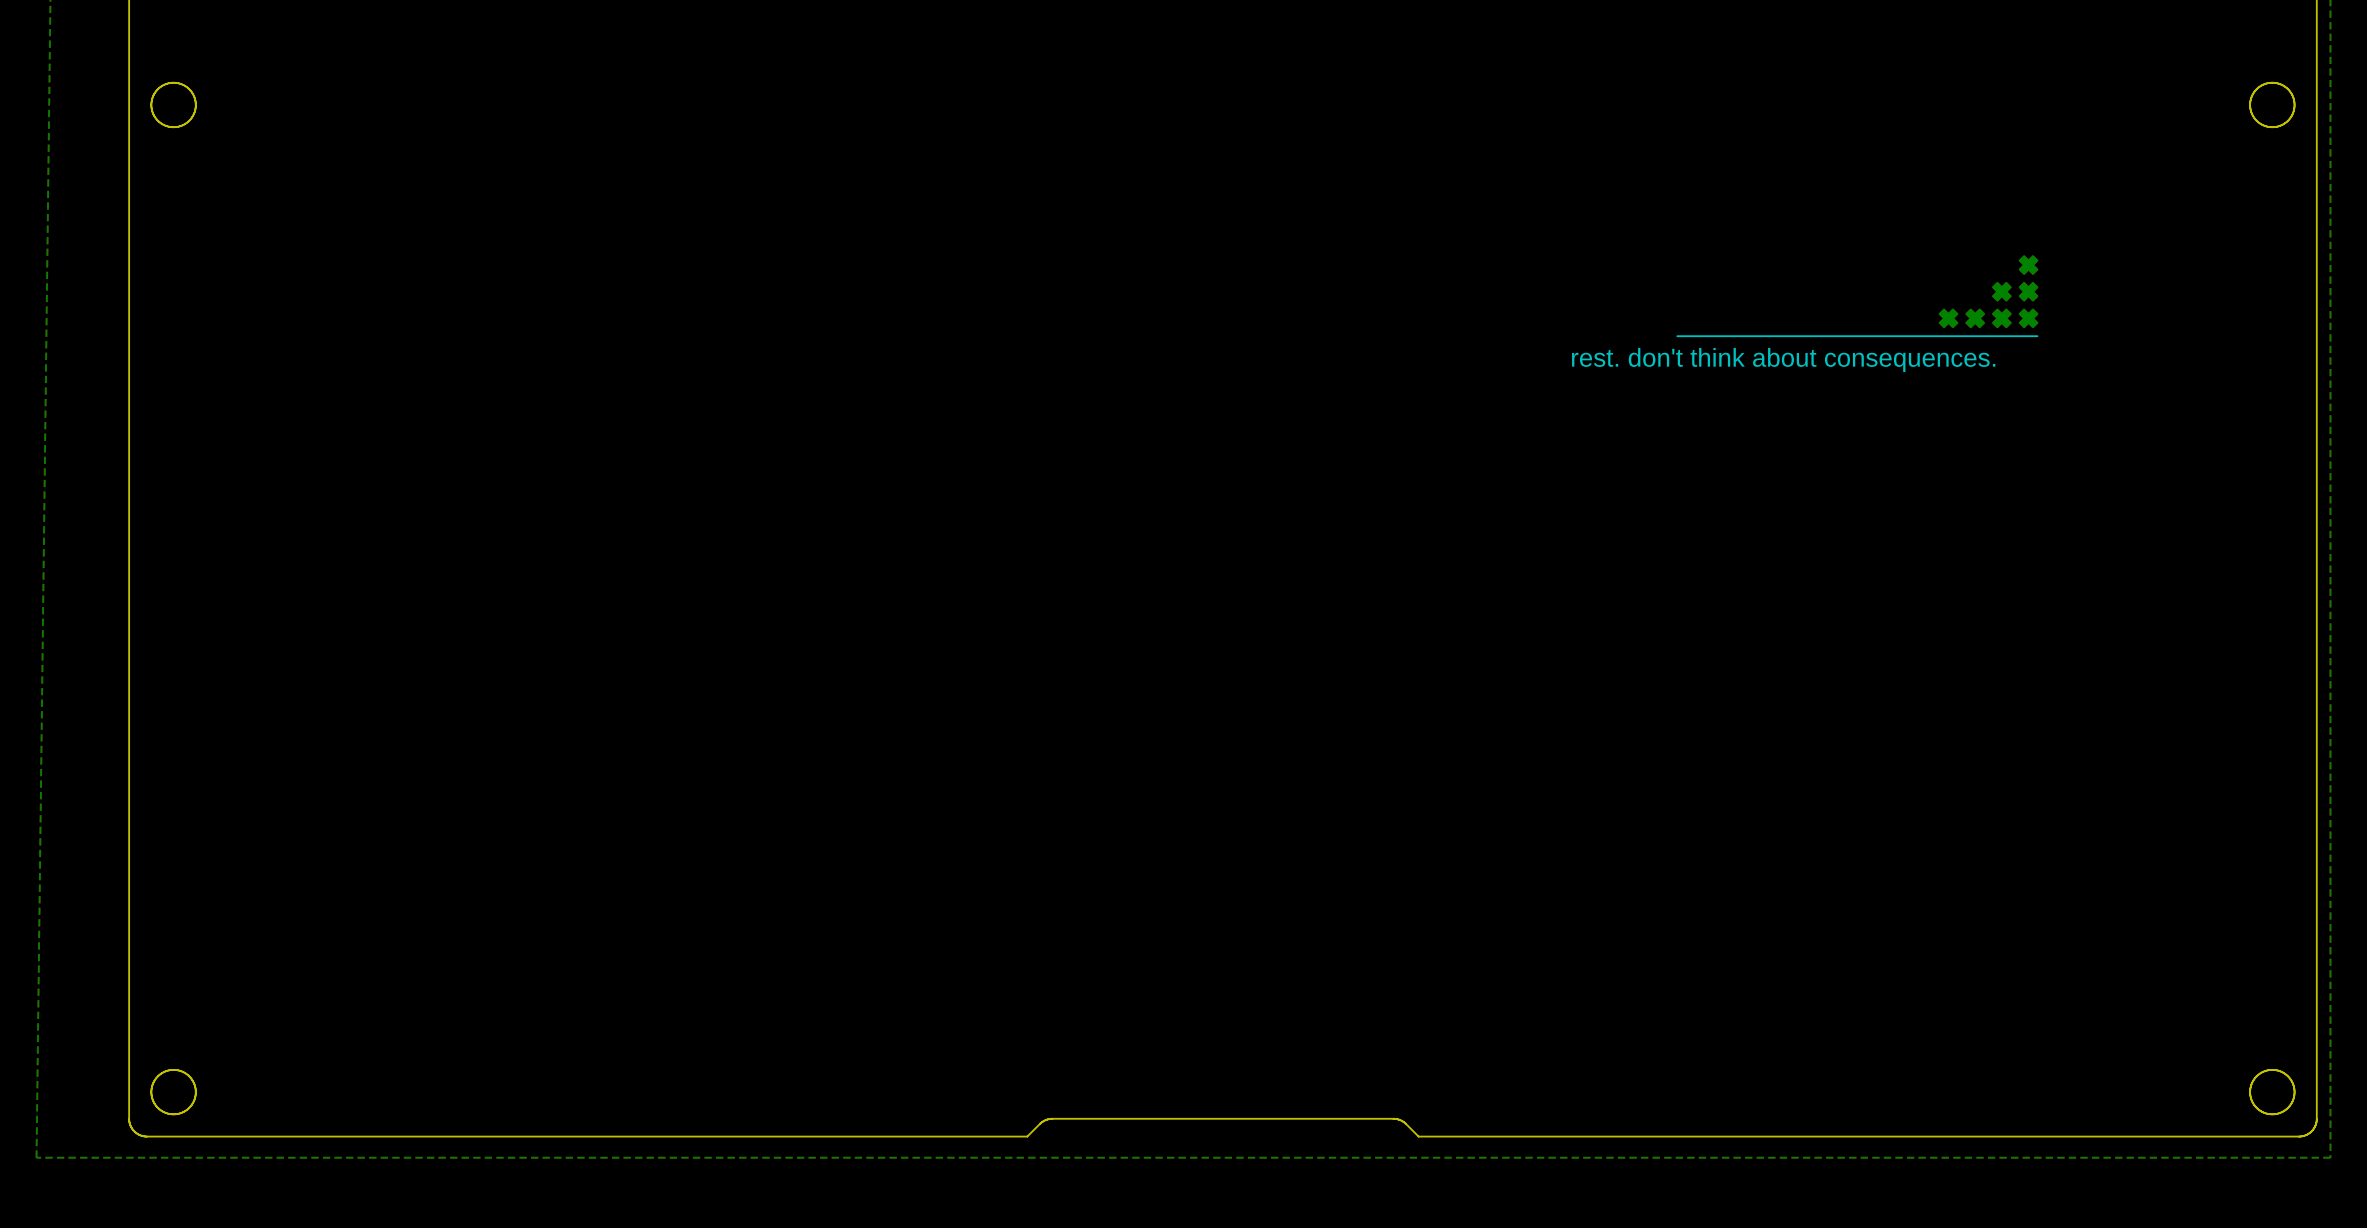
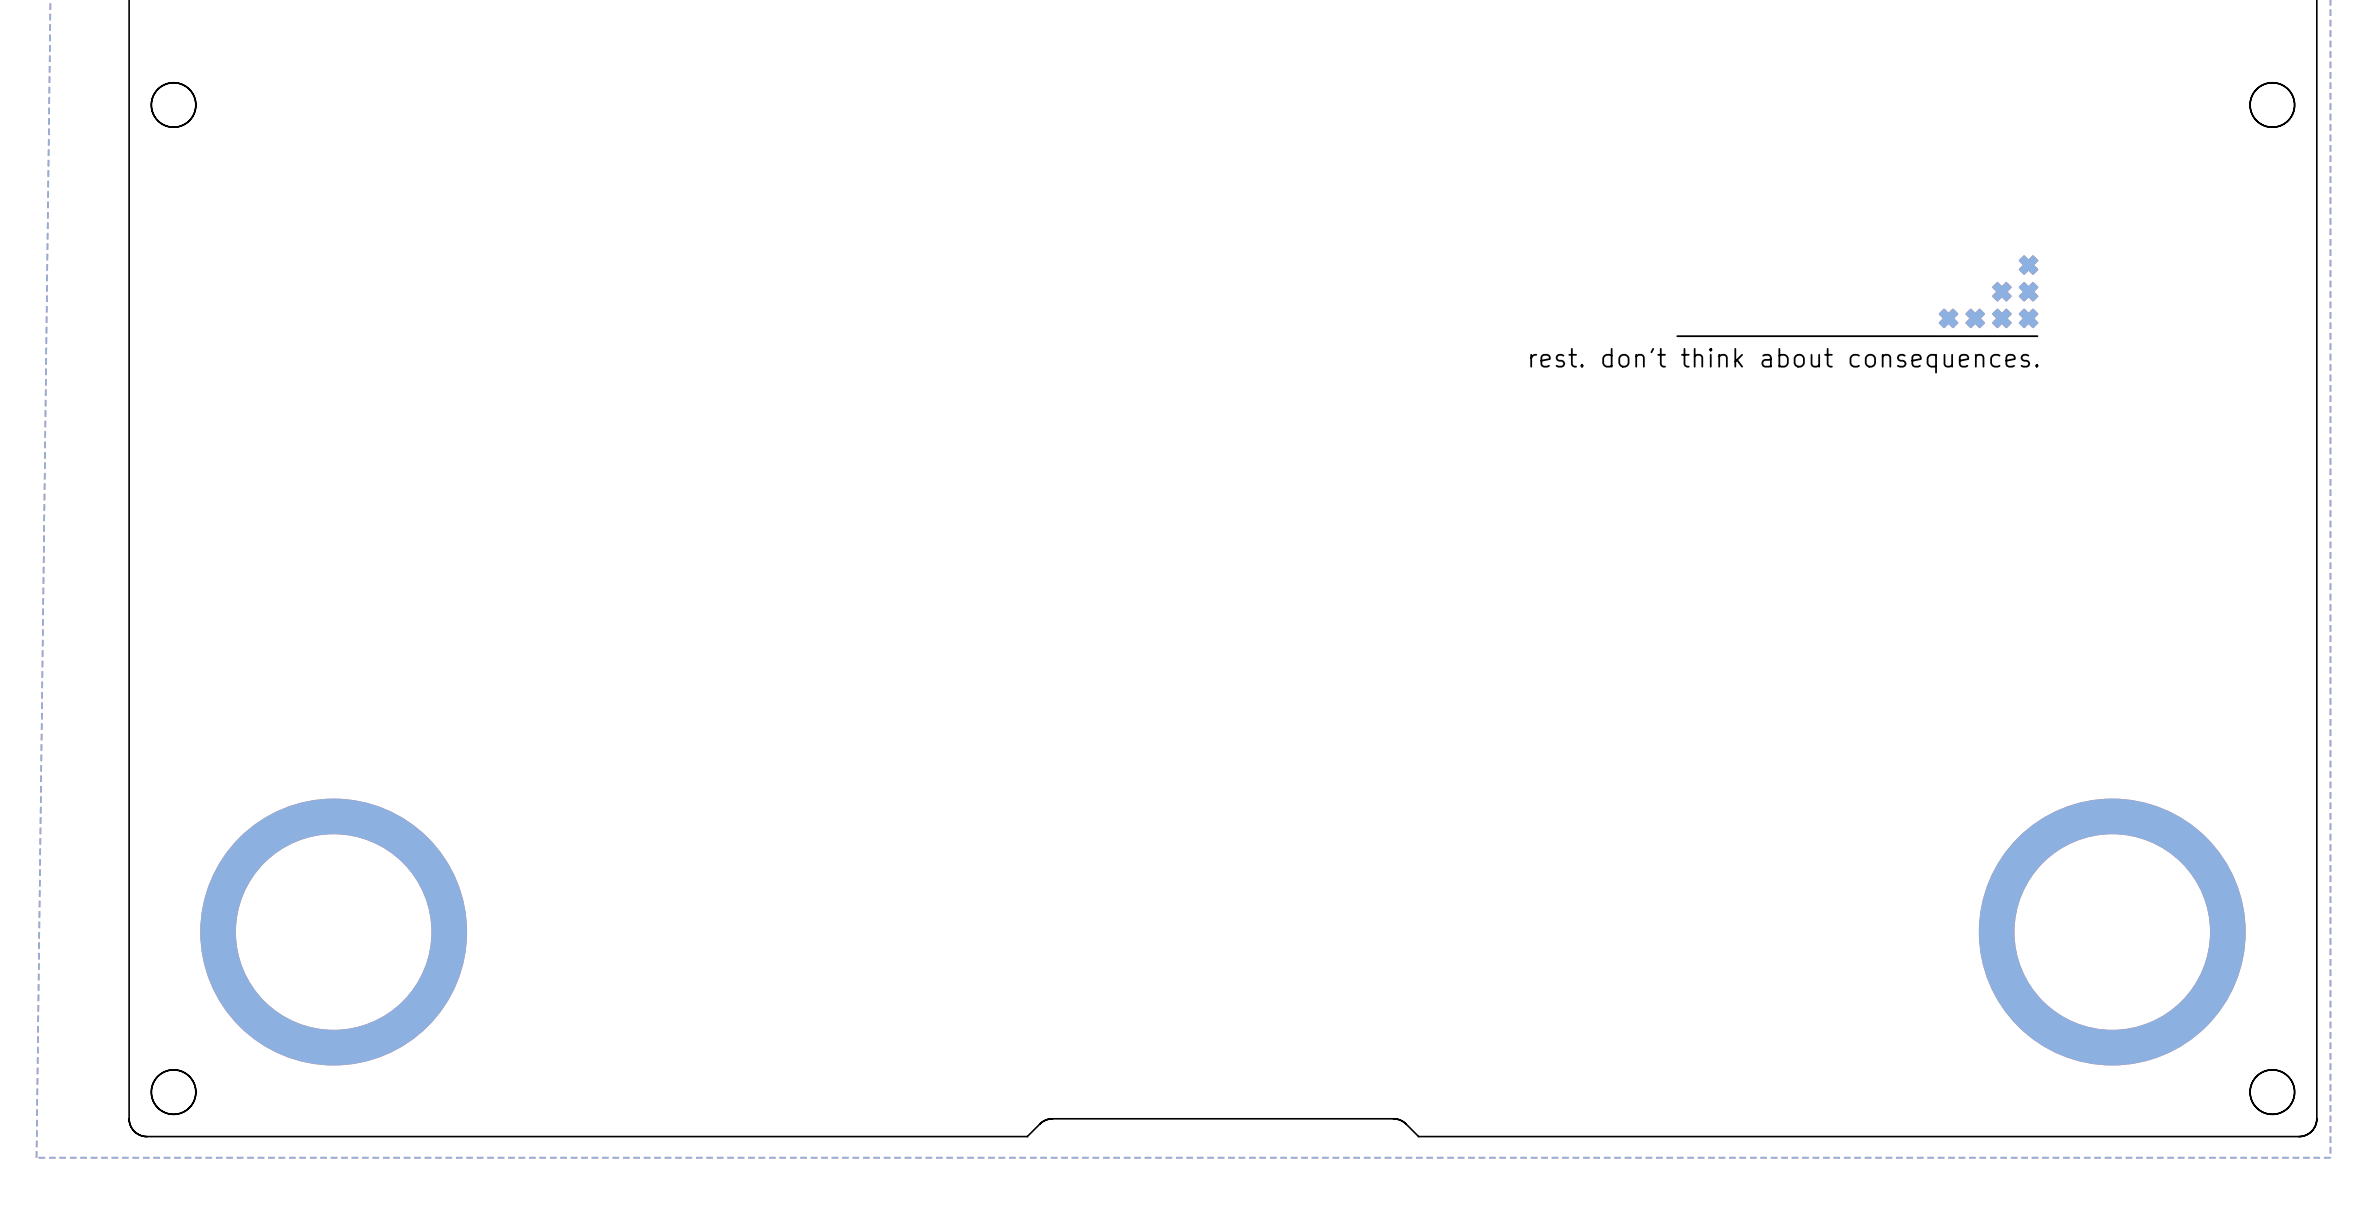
drawing: none -> [200, 798, 468, 1066]
drawing: none -> [1978, 798, 2246, 1066]

